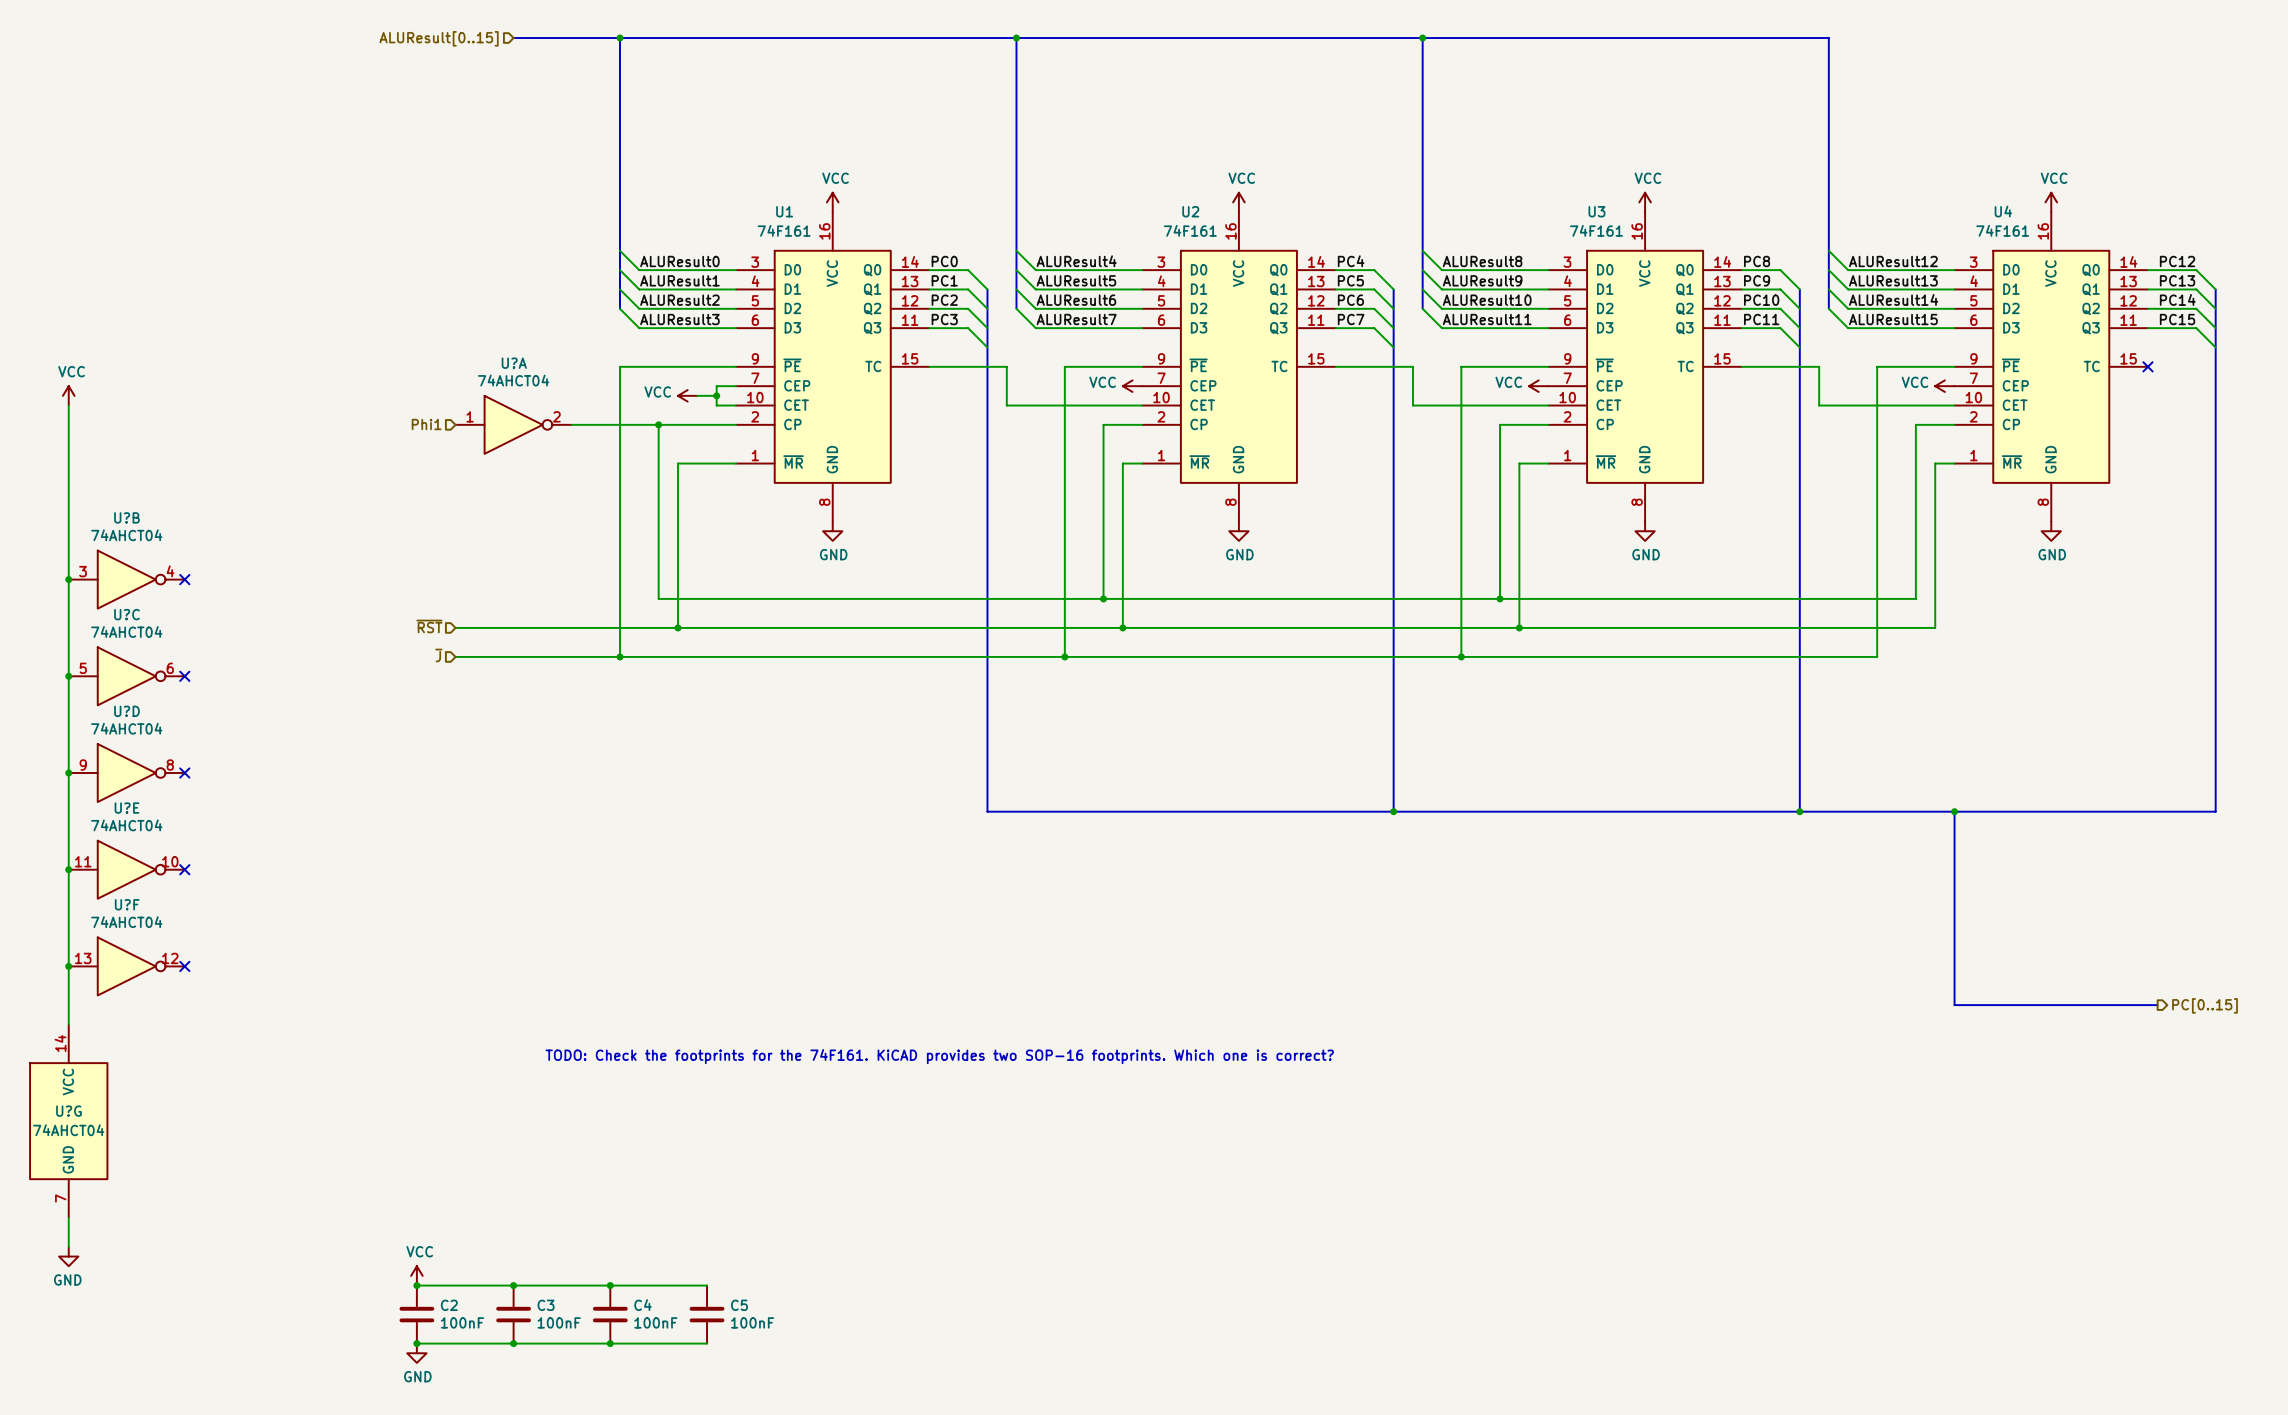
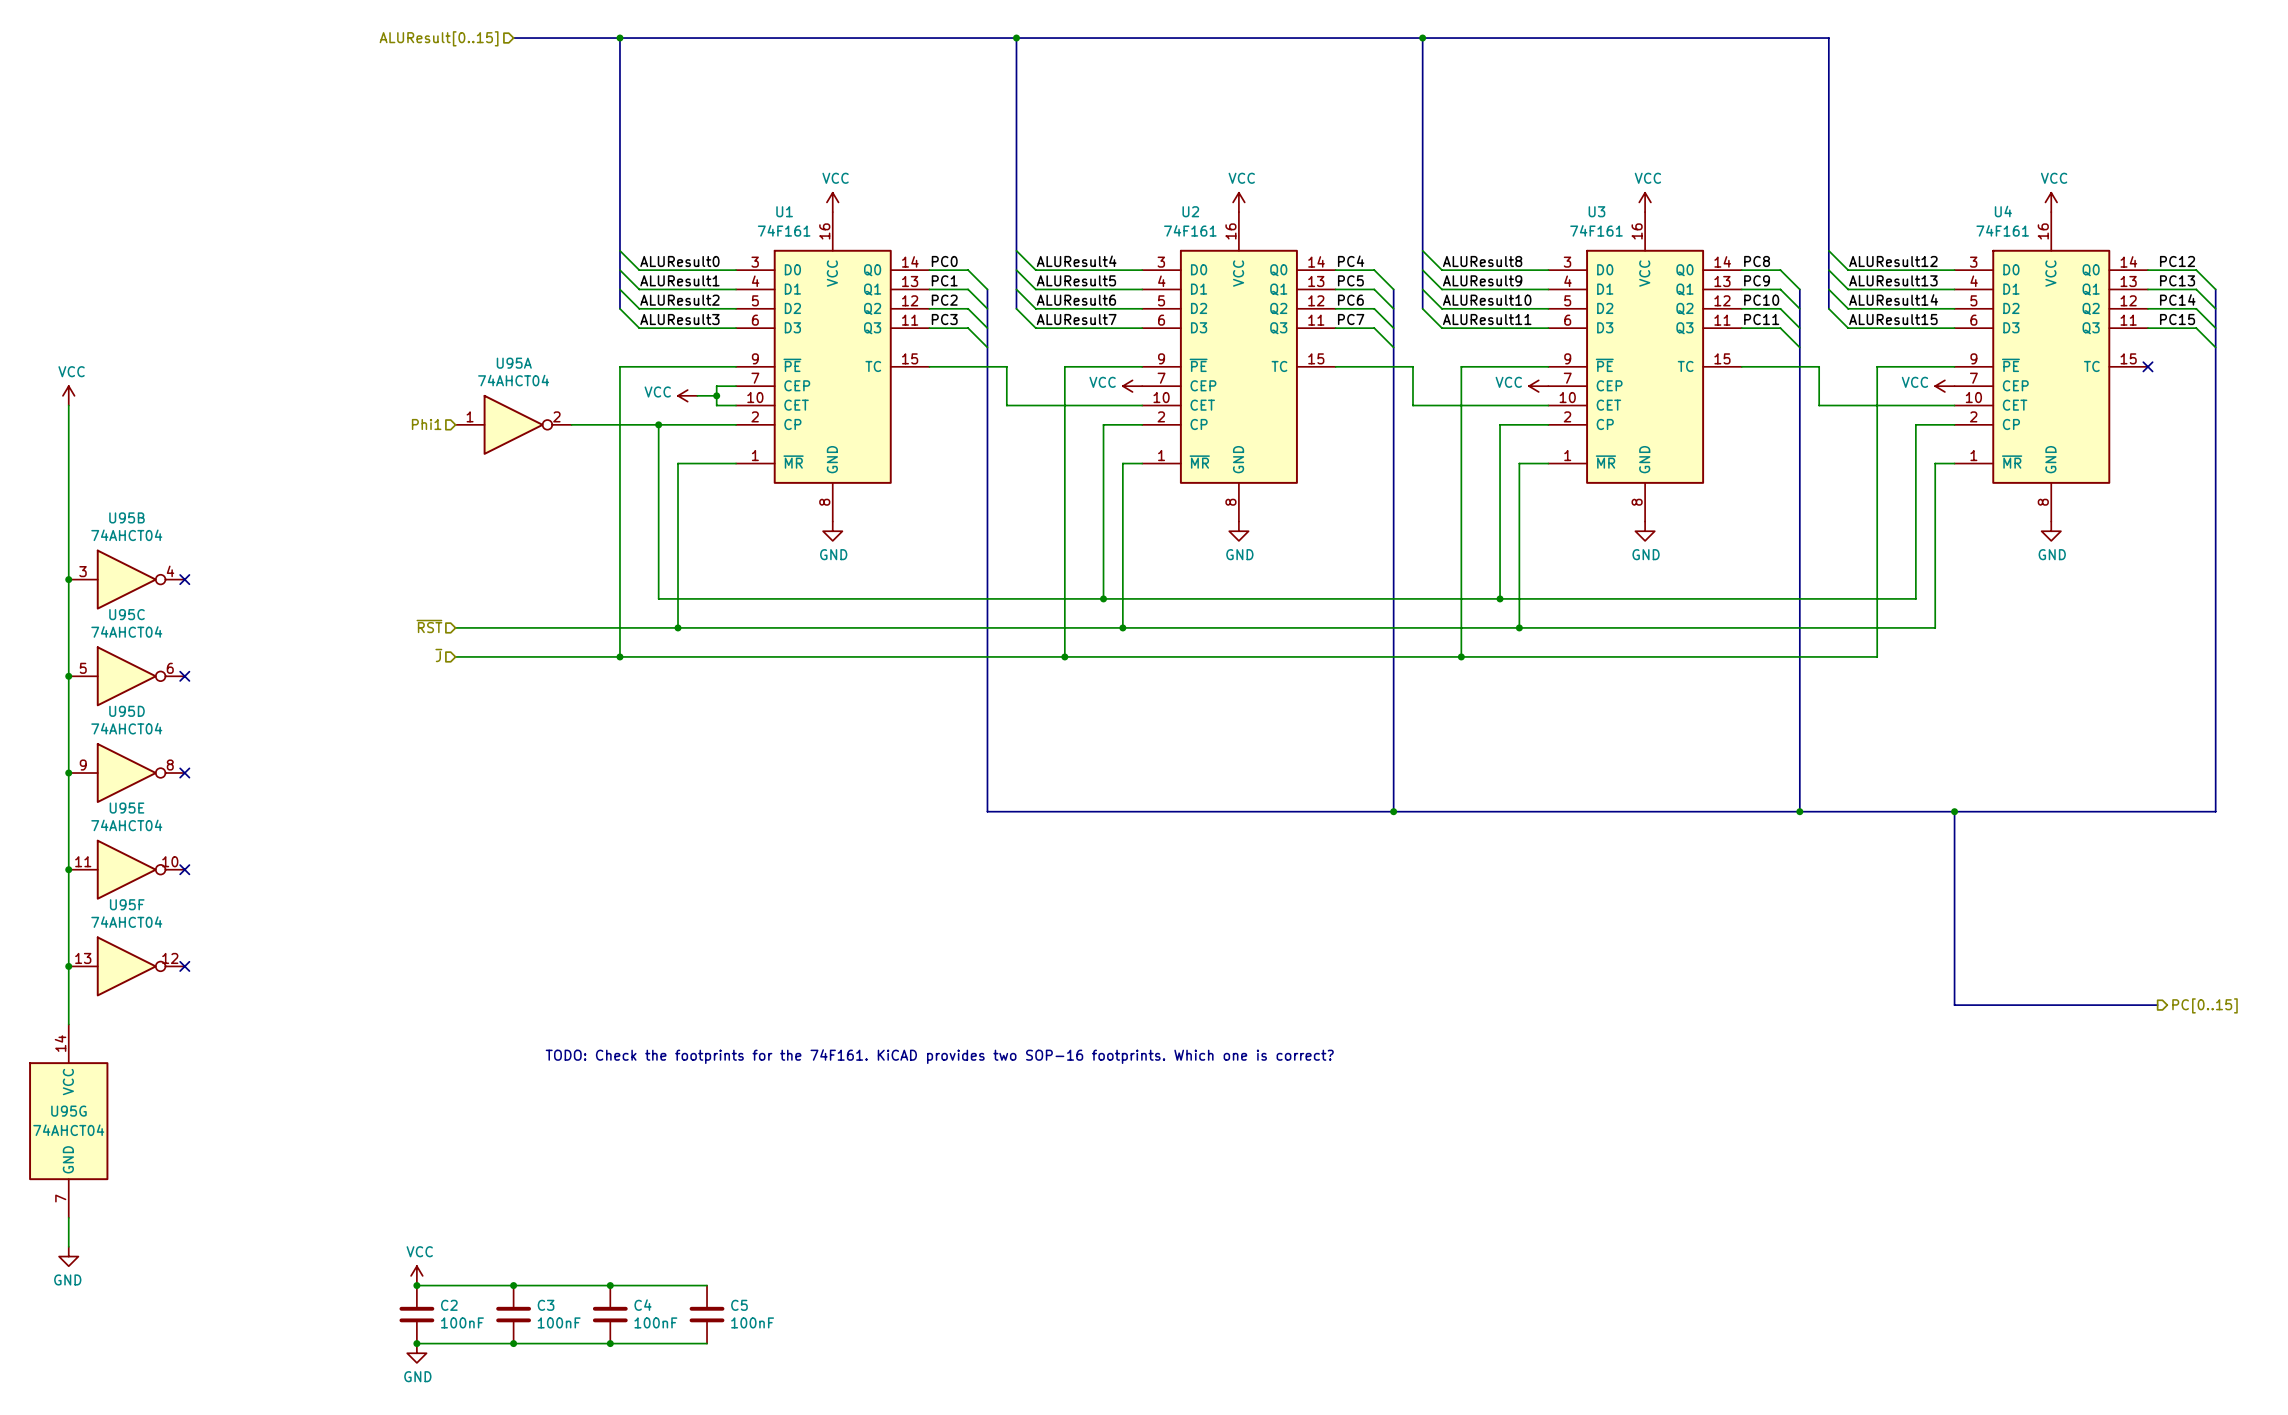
U?A name: U?A (514, 363) -> U95A (514, 363)
U?B name: U?B (126, 517) -> U95B (126, 517)
U?C name: U?C (126, 614) -> U95C (126, 614)
U?D name: U?D (126, 711) -> U95D (126, 711)
U?E name: U?E (126, 808) -> U95E (126, 808)
U?F name: U?F (127, 904) -> U95F (127, 904)
U?G name: U?G (68, 1111) -> U95G (68, 1111)

